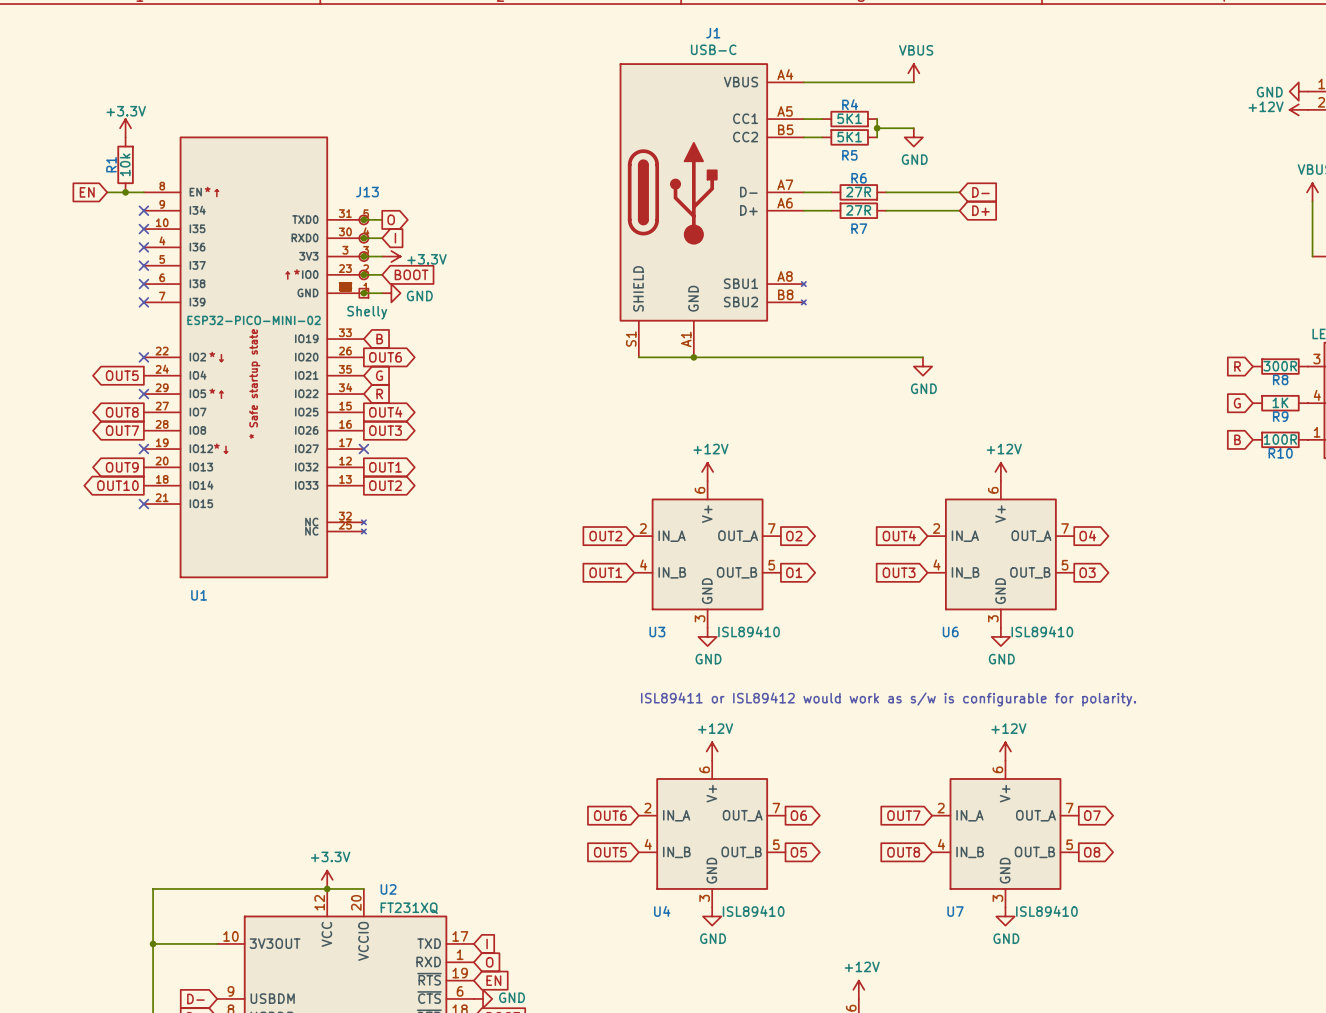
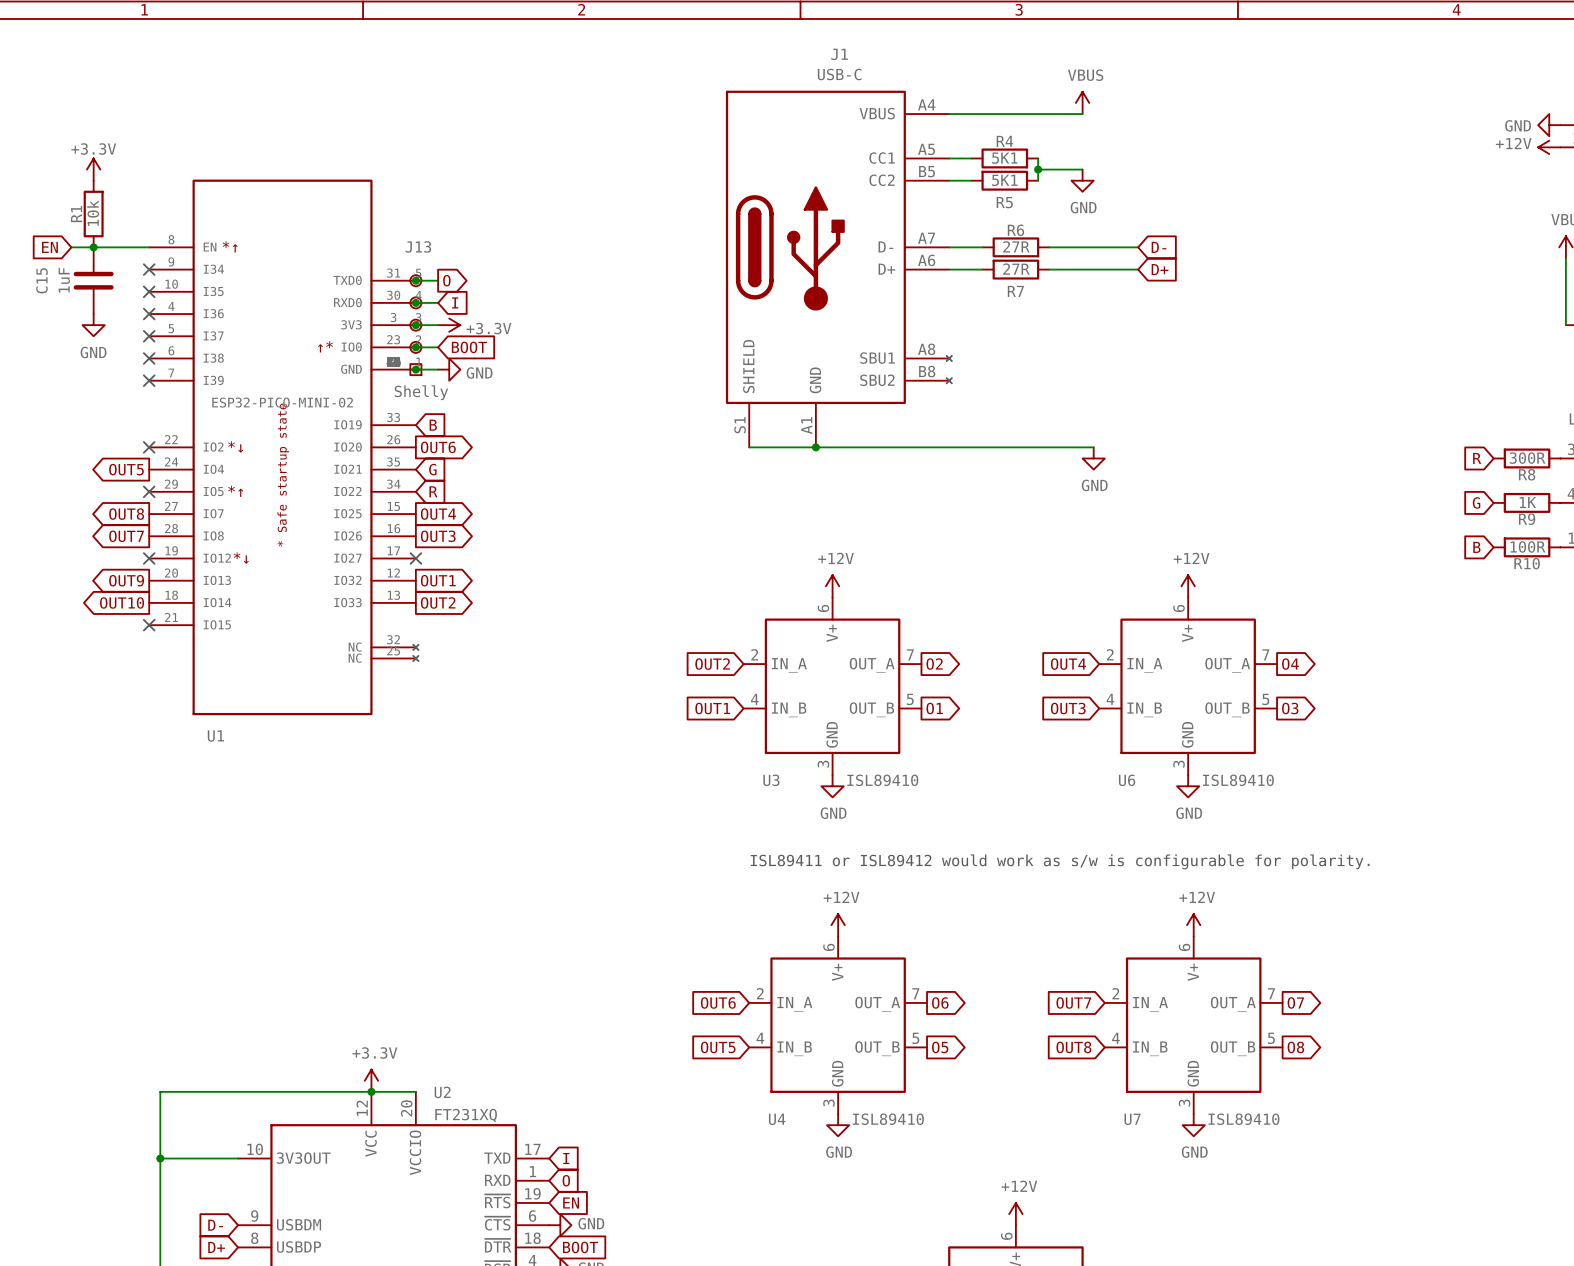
power symbol position: +3.3V (125, 128) -> +3.3V (93, 169)
R1 position: (125, 164) -> (93, 214)
wire: none -> (71, 247) (104, 247)
global label position: EN (87, 192) -> EN (49, 247)
junction position: (125, 192) -> (93, 247)
C15: none -> 1uF (93, 280)
power symbol: none -> GND (93, 325)

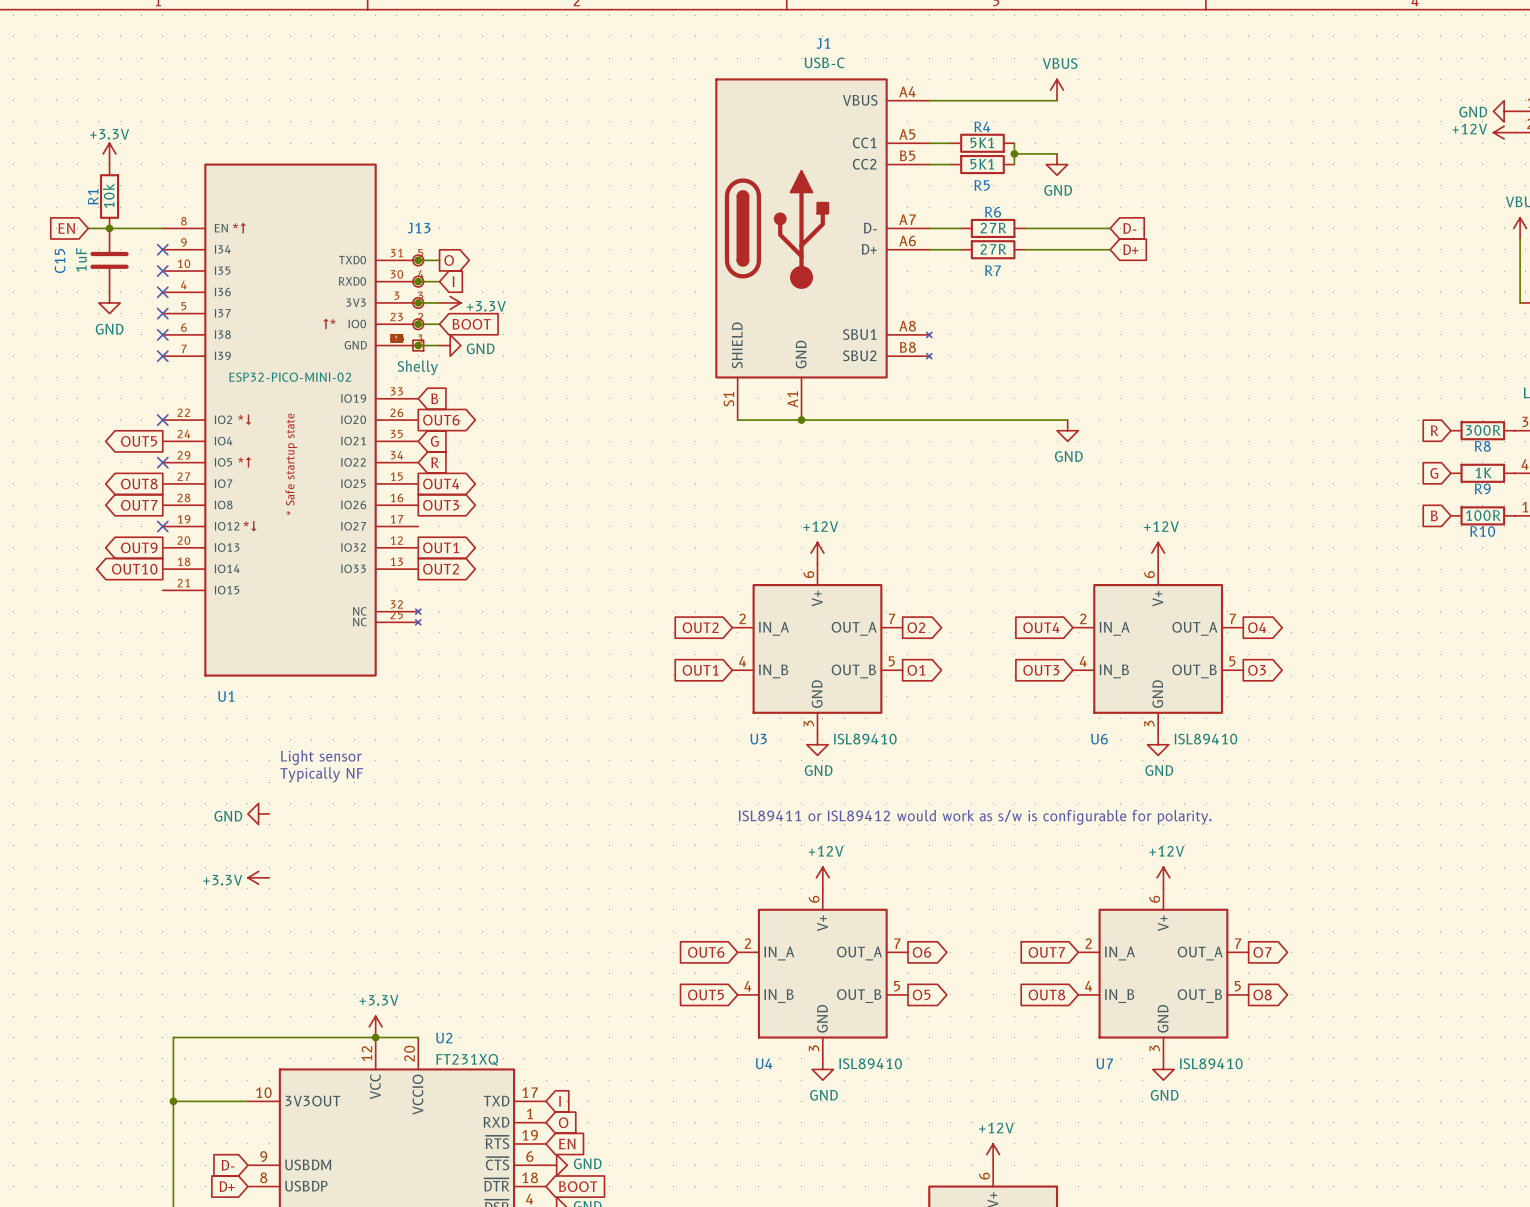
no-connect mark: (415, 558) -> none
no-connect mark: (149, 625) -> none
text: none -> Light sensor (321, 757)
text: none -> Typically NF (321, 774)
power symbol: none -> GND (258, 813)
power symbol: none -> +3.3V (258, 877)

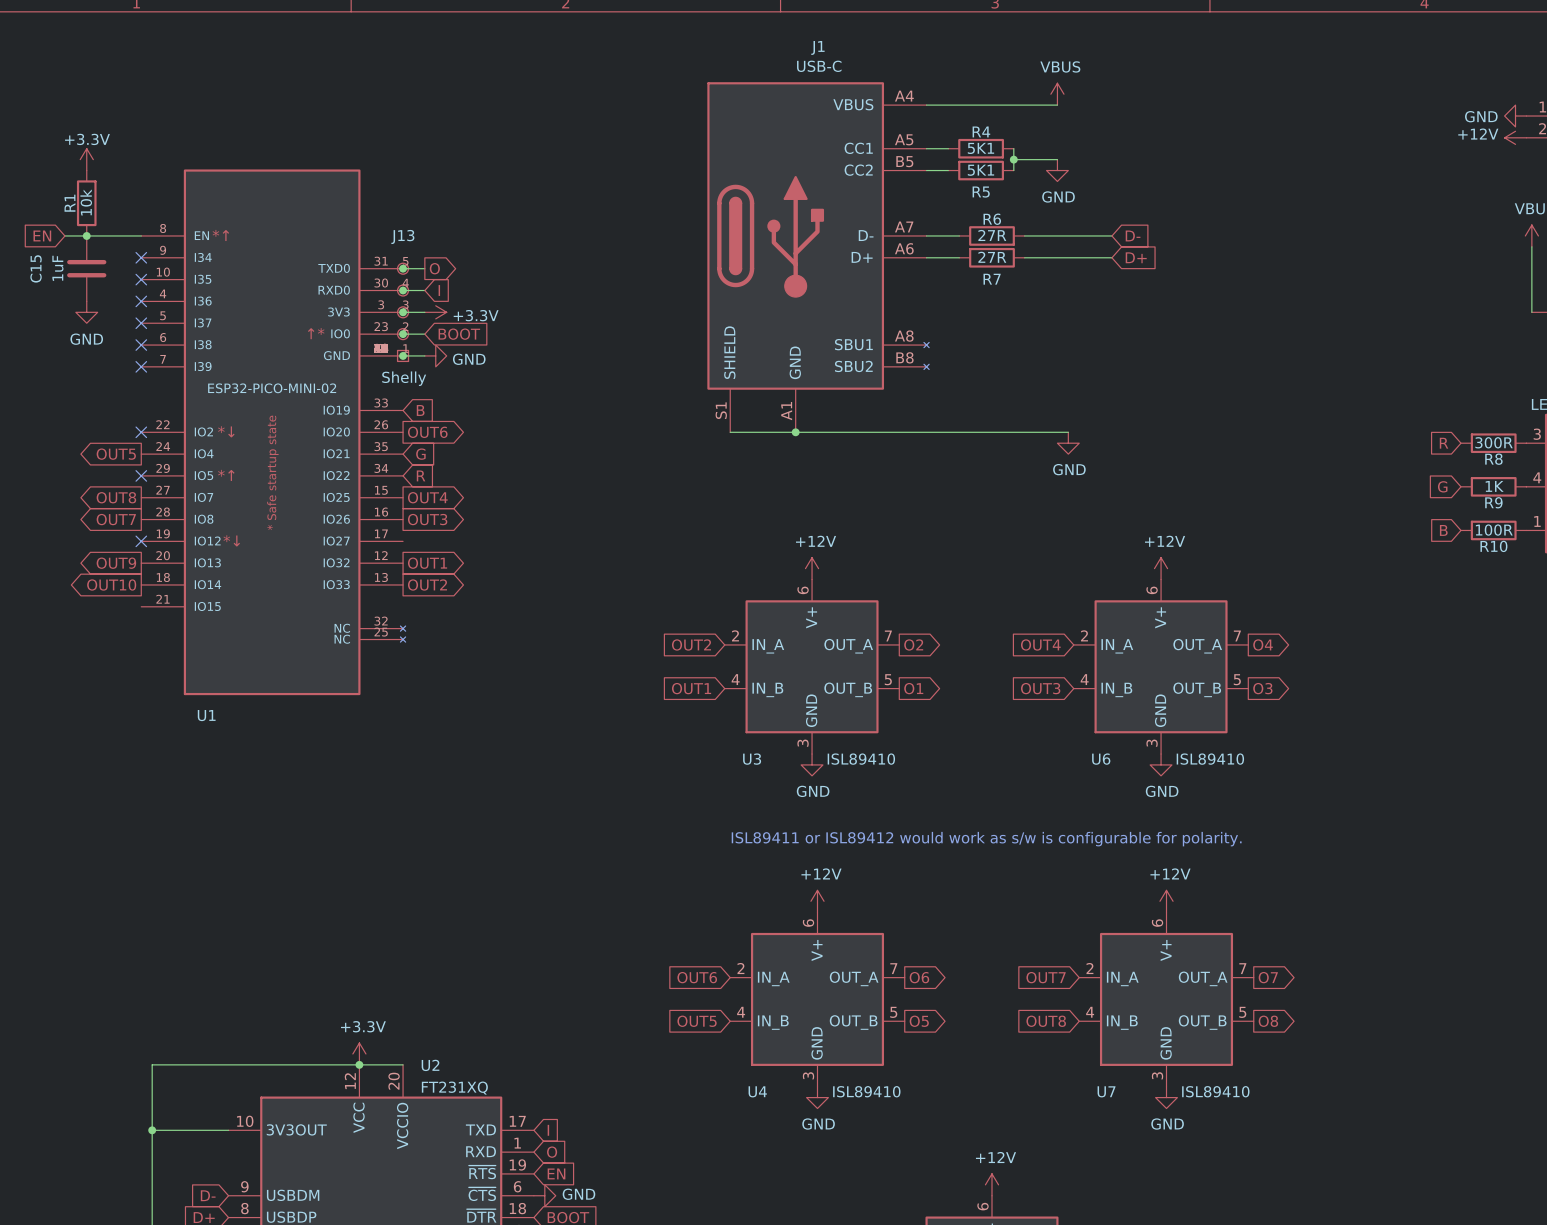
text: Light sensor (321, 757) -> none
text: Typically NF (321, 774) -> none
power symbol: GND (258, 813) -> none
power symbol: +3.3V (258, 877) -> none

